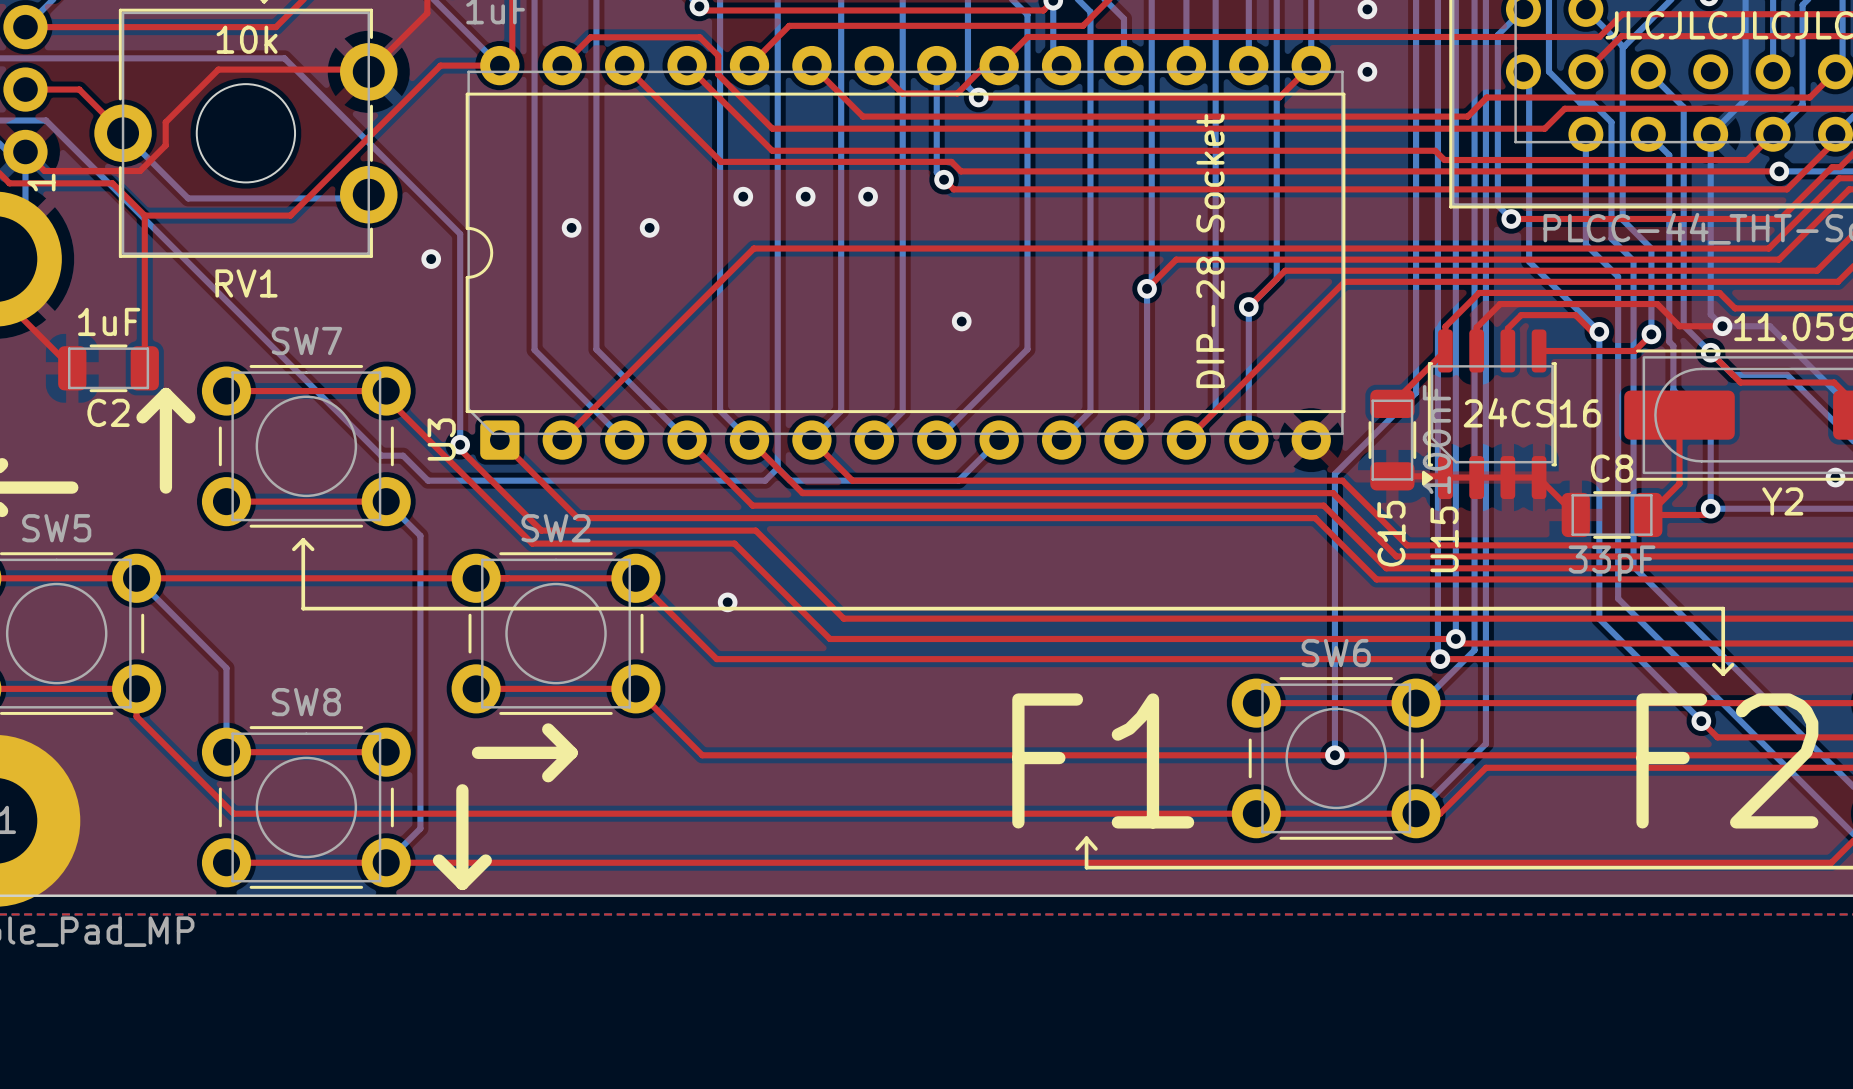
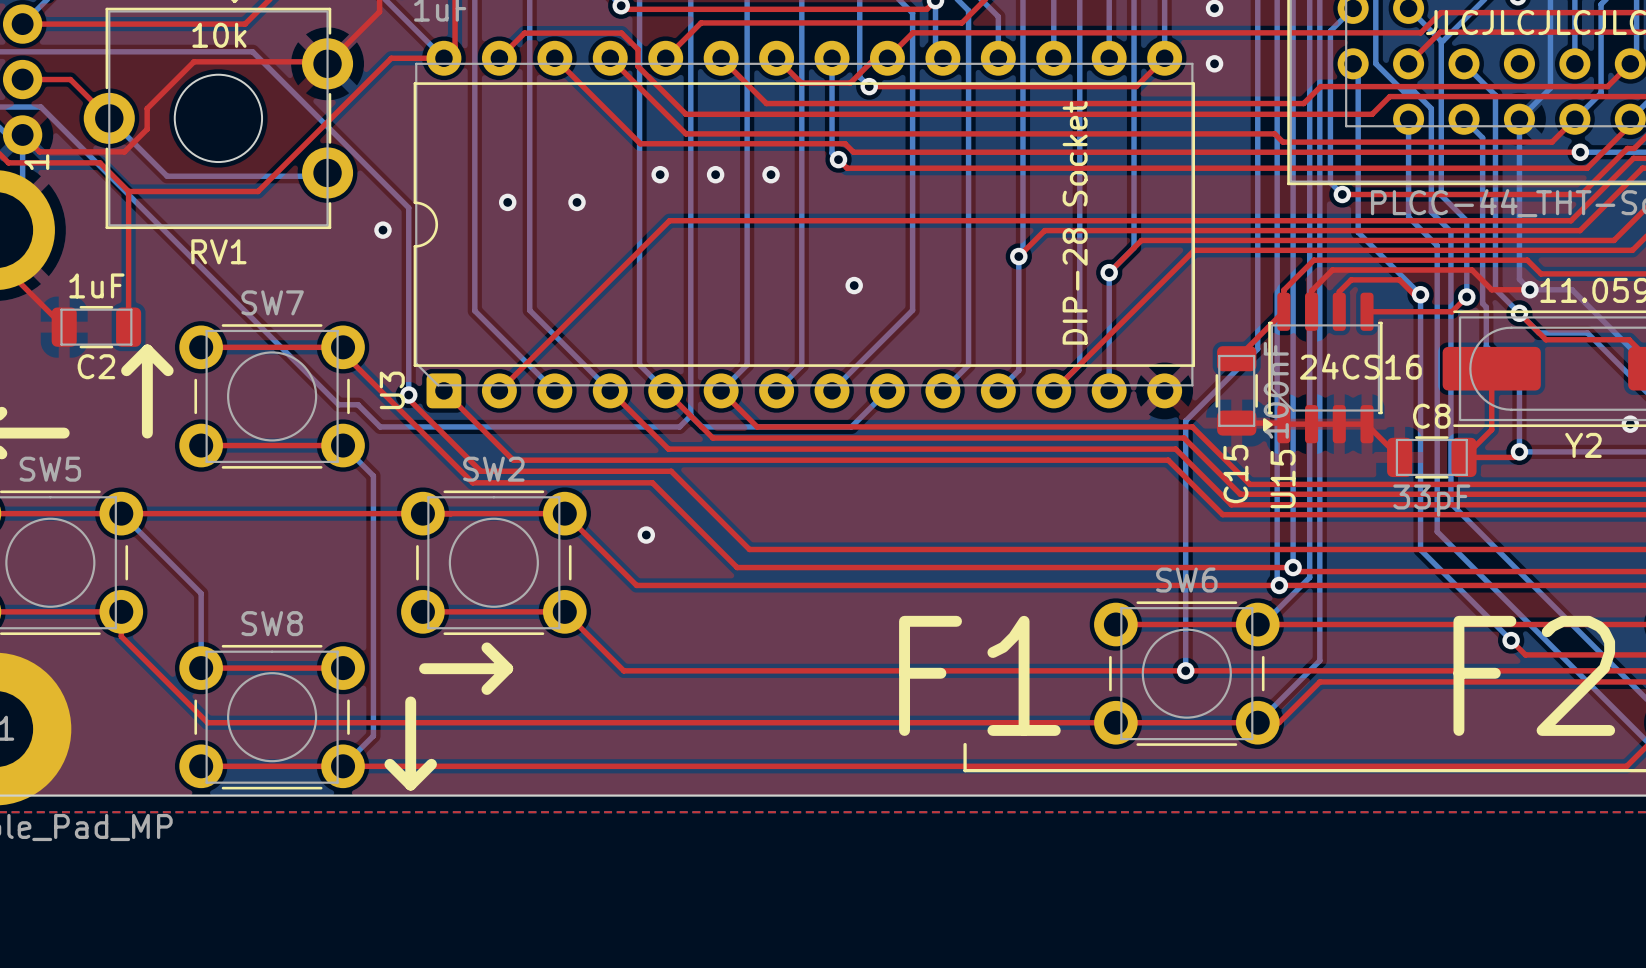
line: (303, 539) (312, 549) -> none
line: (303, 539) (293, 549) -> none
line: (303, 539) (303, 608) (1723, 608) (1723, 674) -> none
line: (1713, 664) (1723, 674) -> none
line: (1732, 664) (1723, 674) -> none
line: (1077, 848) (1086, 838) (1095, 848) -> none

